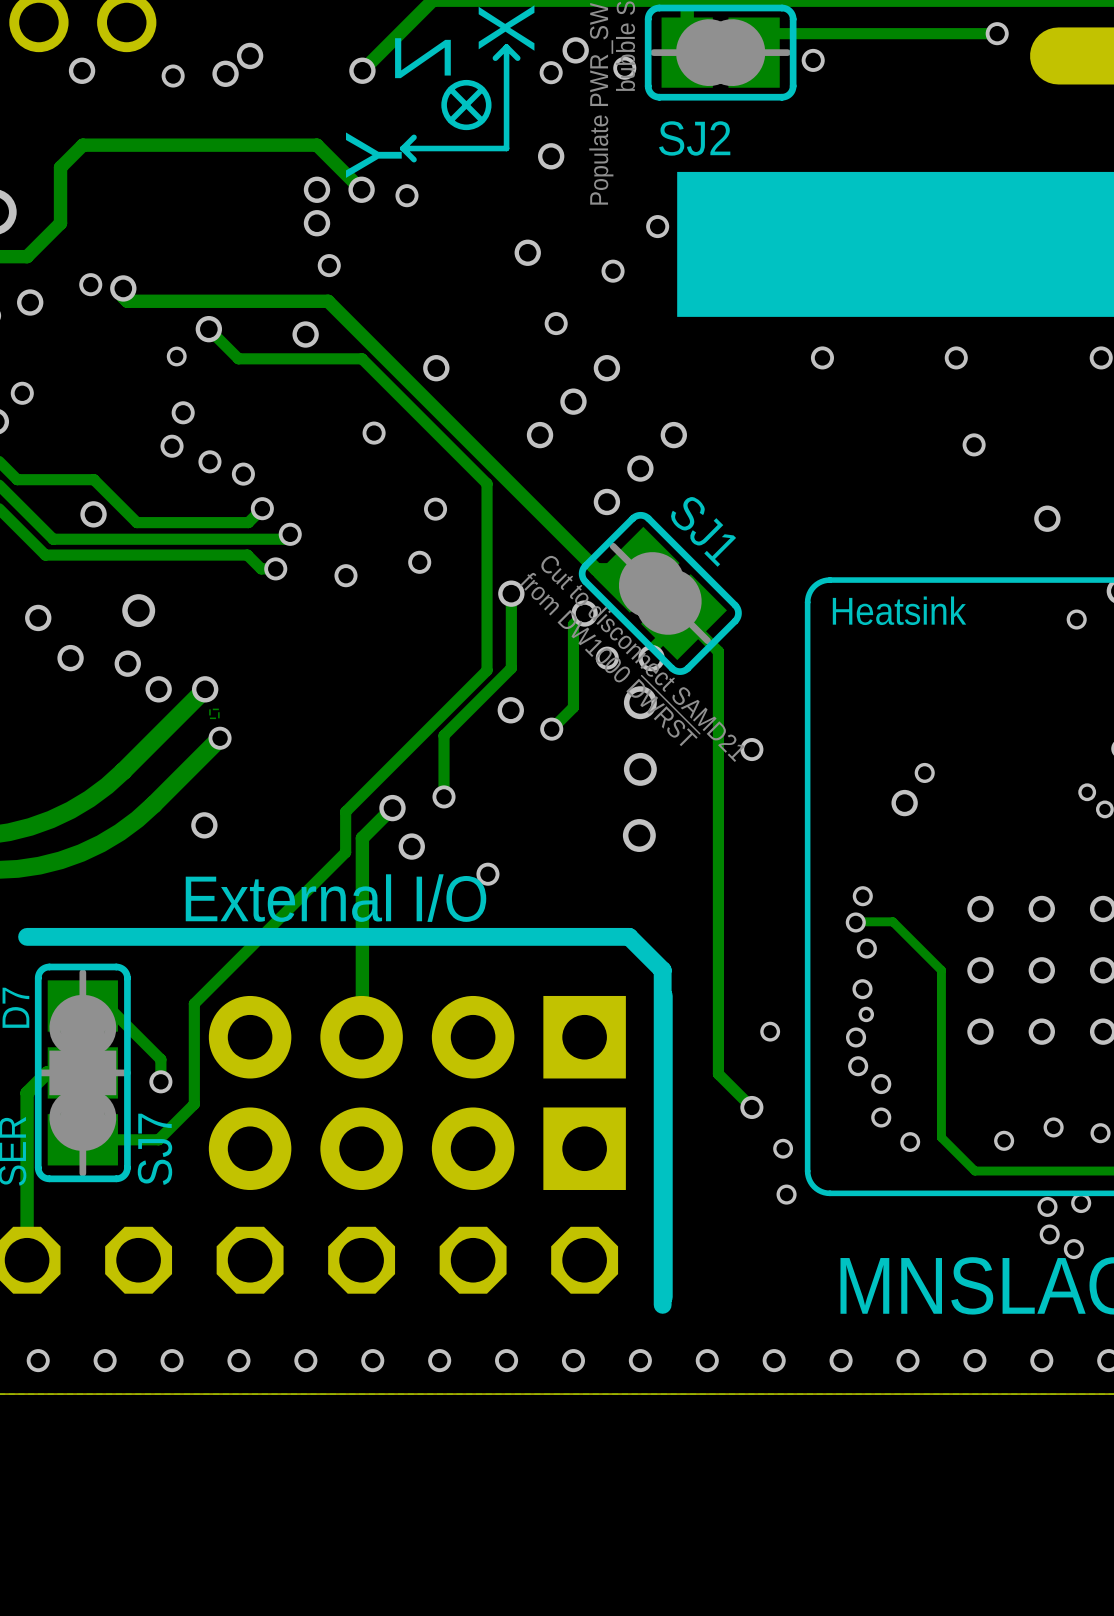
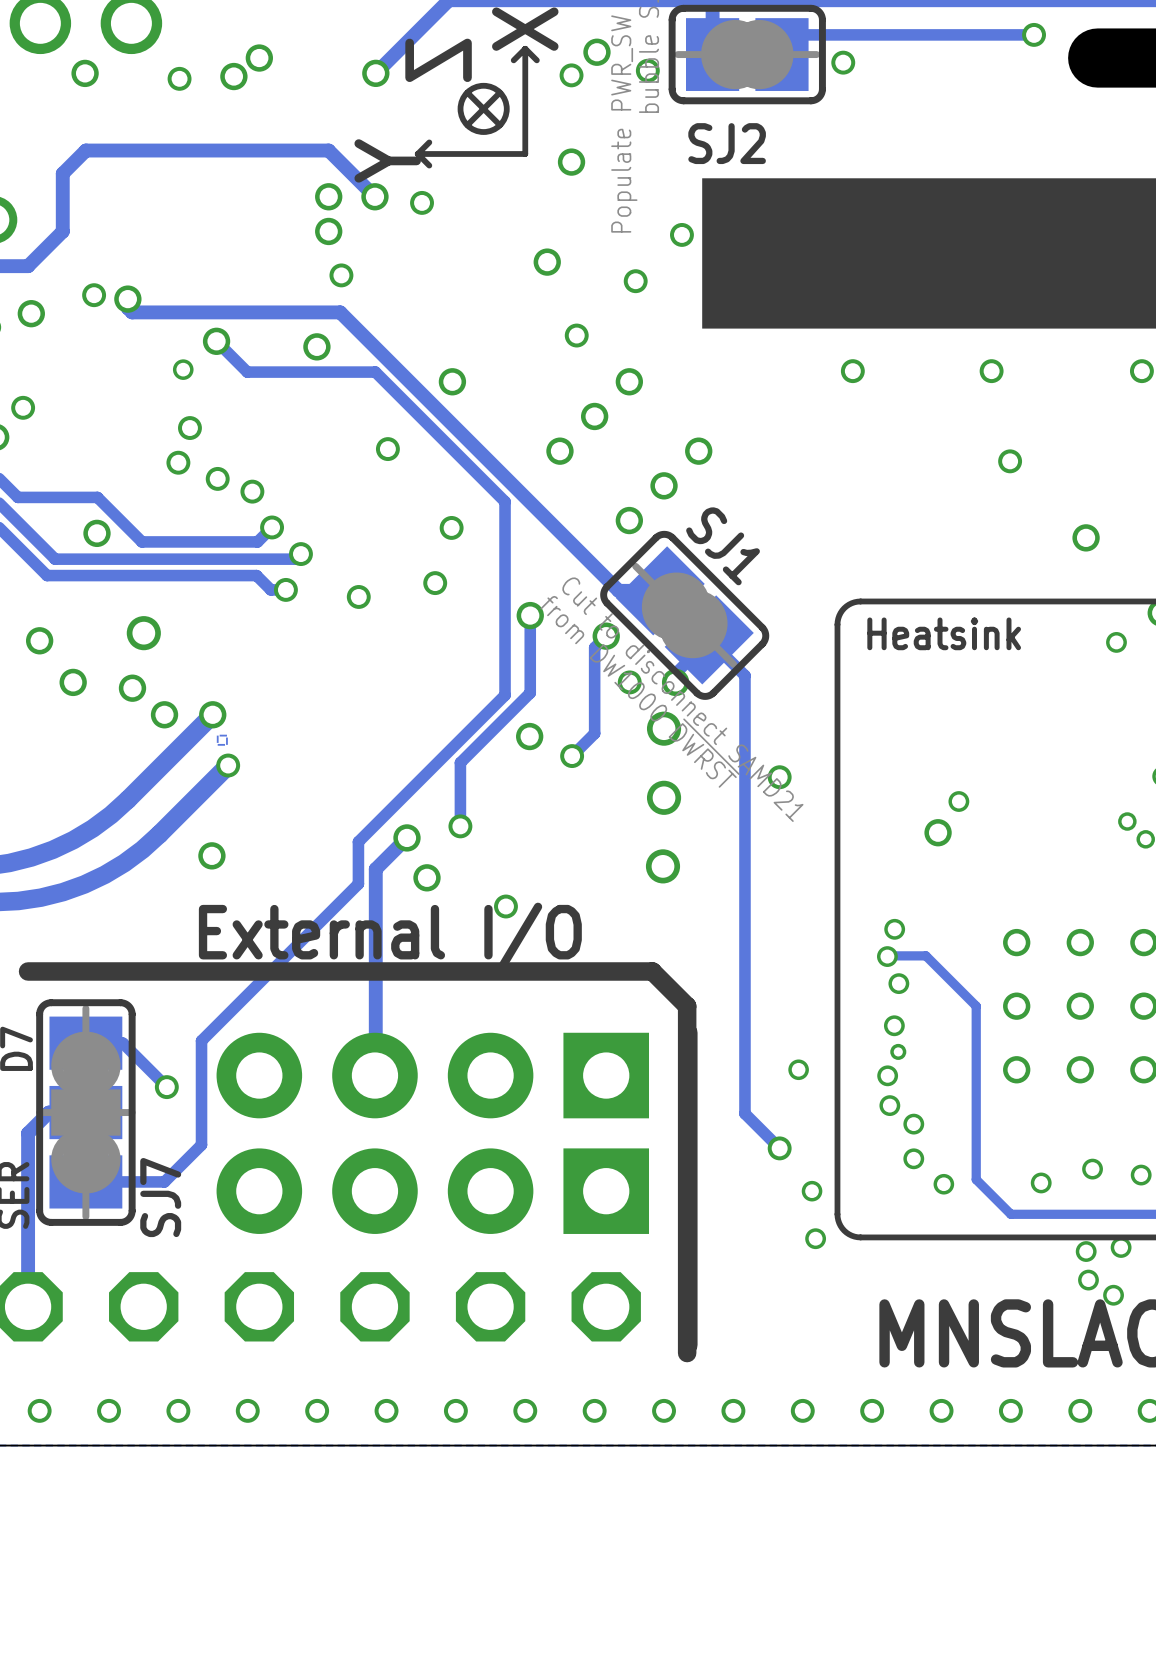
track: (107, 1006) (160, 1059) (160, 1081) -> (111, 1043) (122, 1043) (166, 1087)
via position: (160, 1081) -> (166, 1087)

